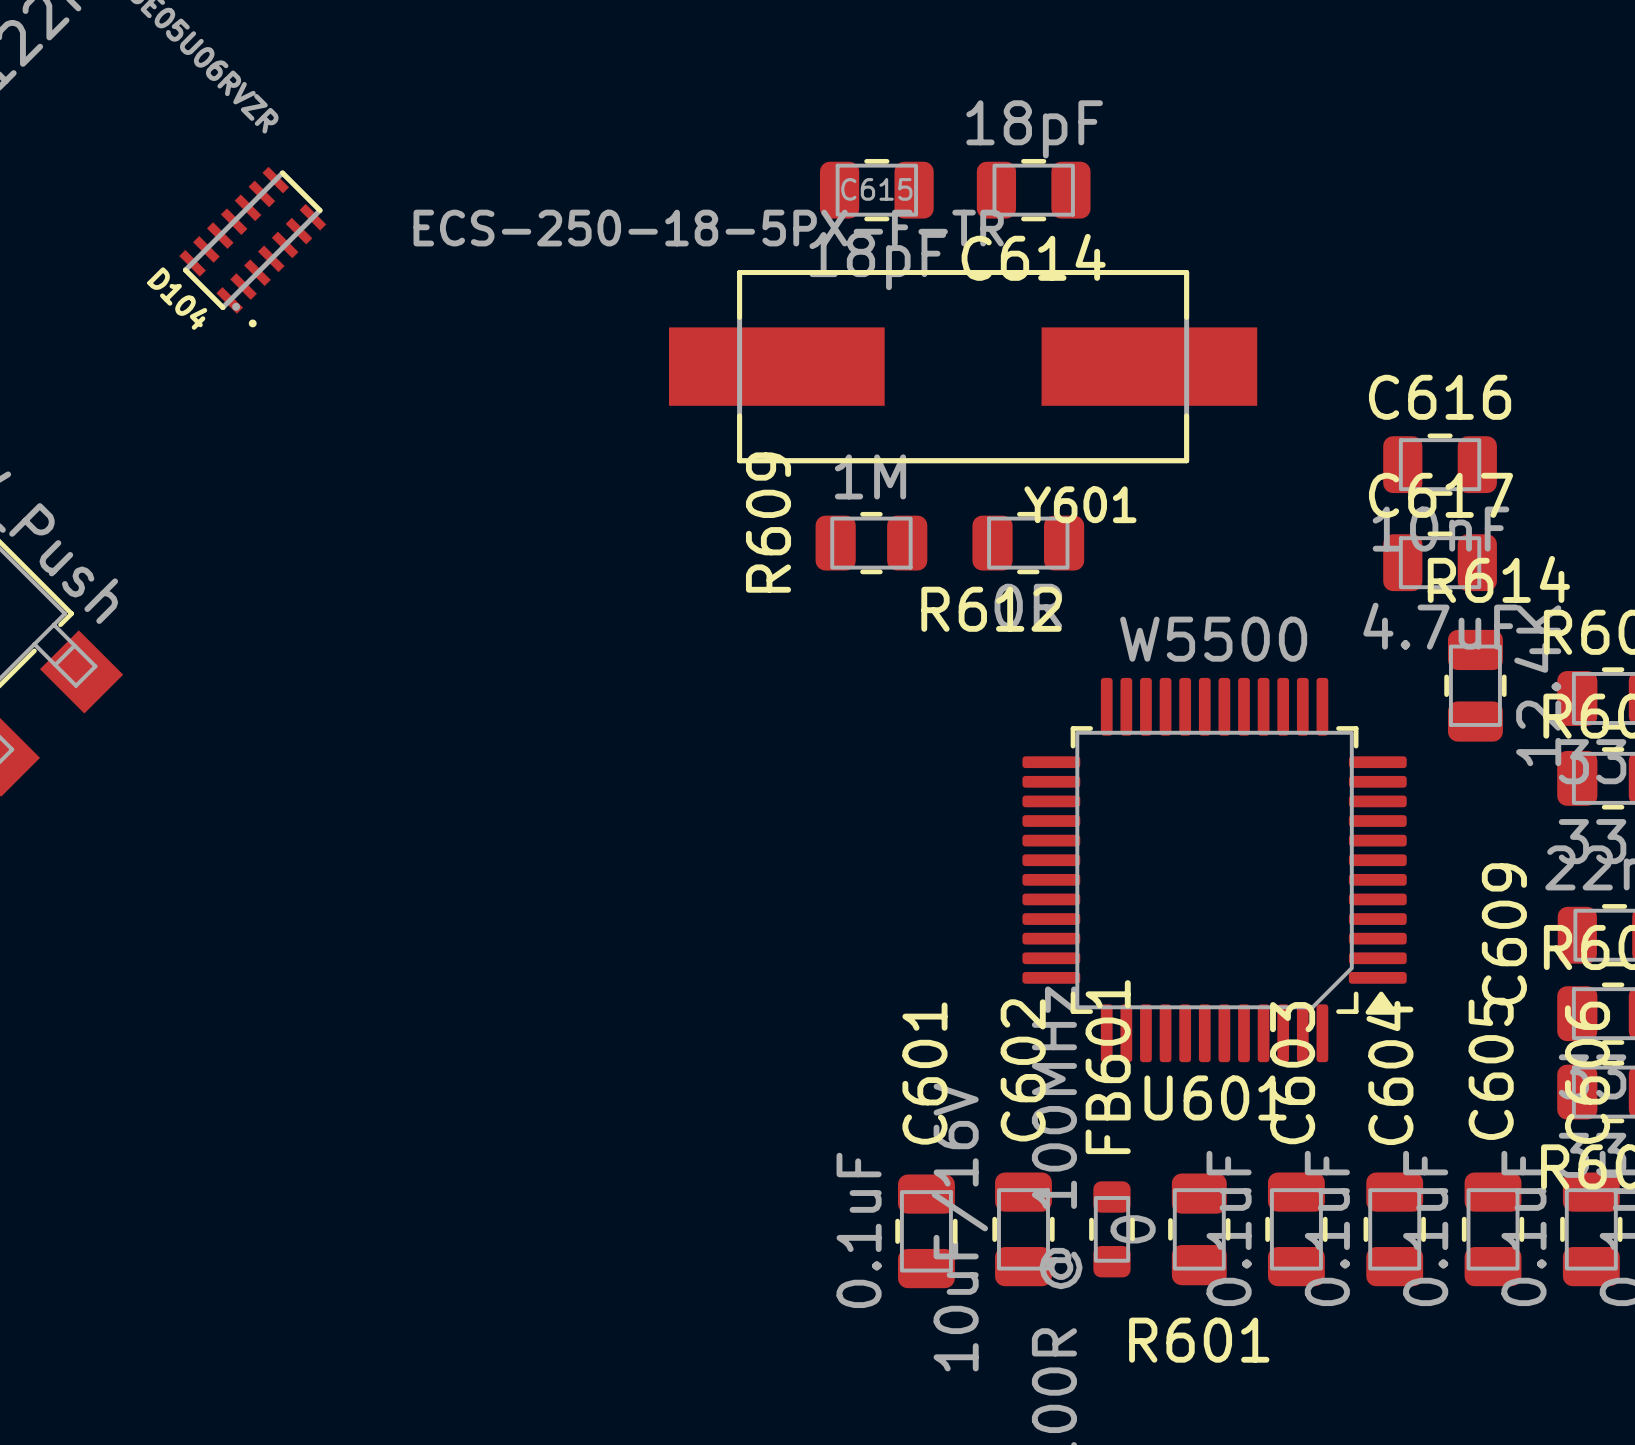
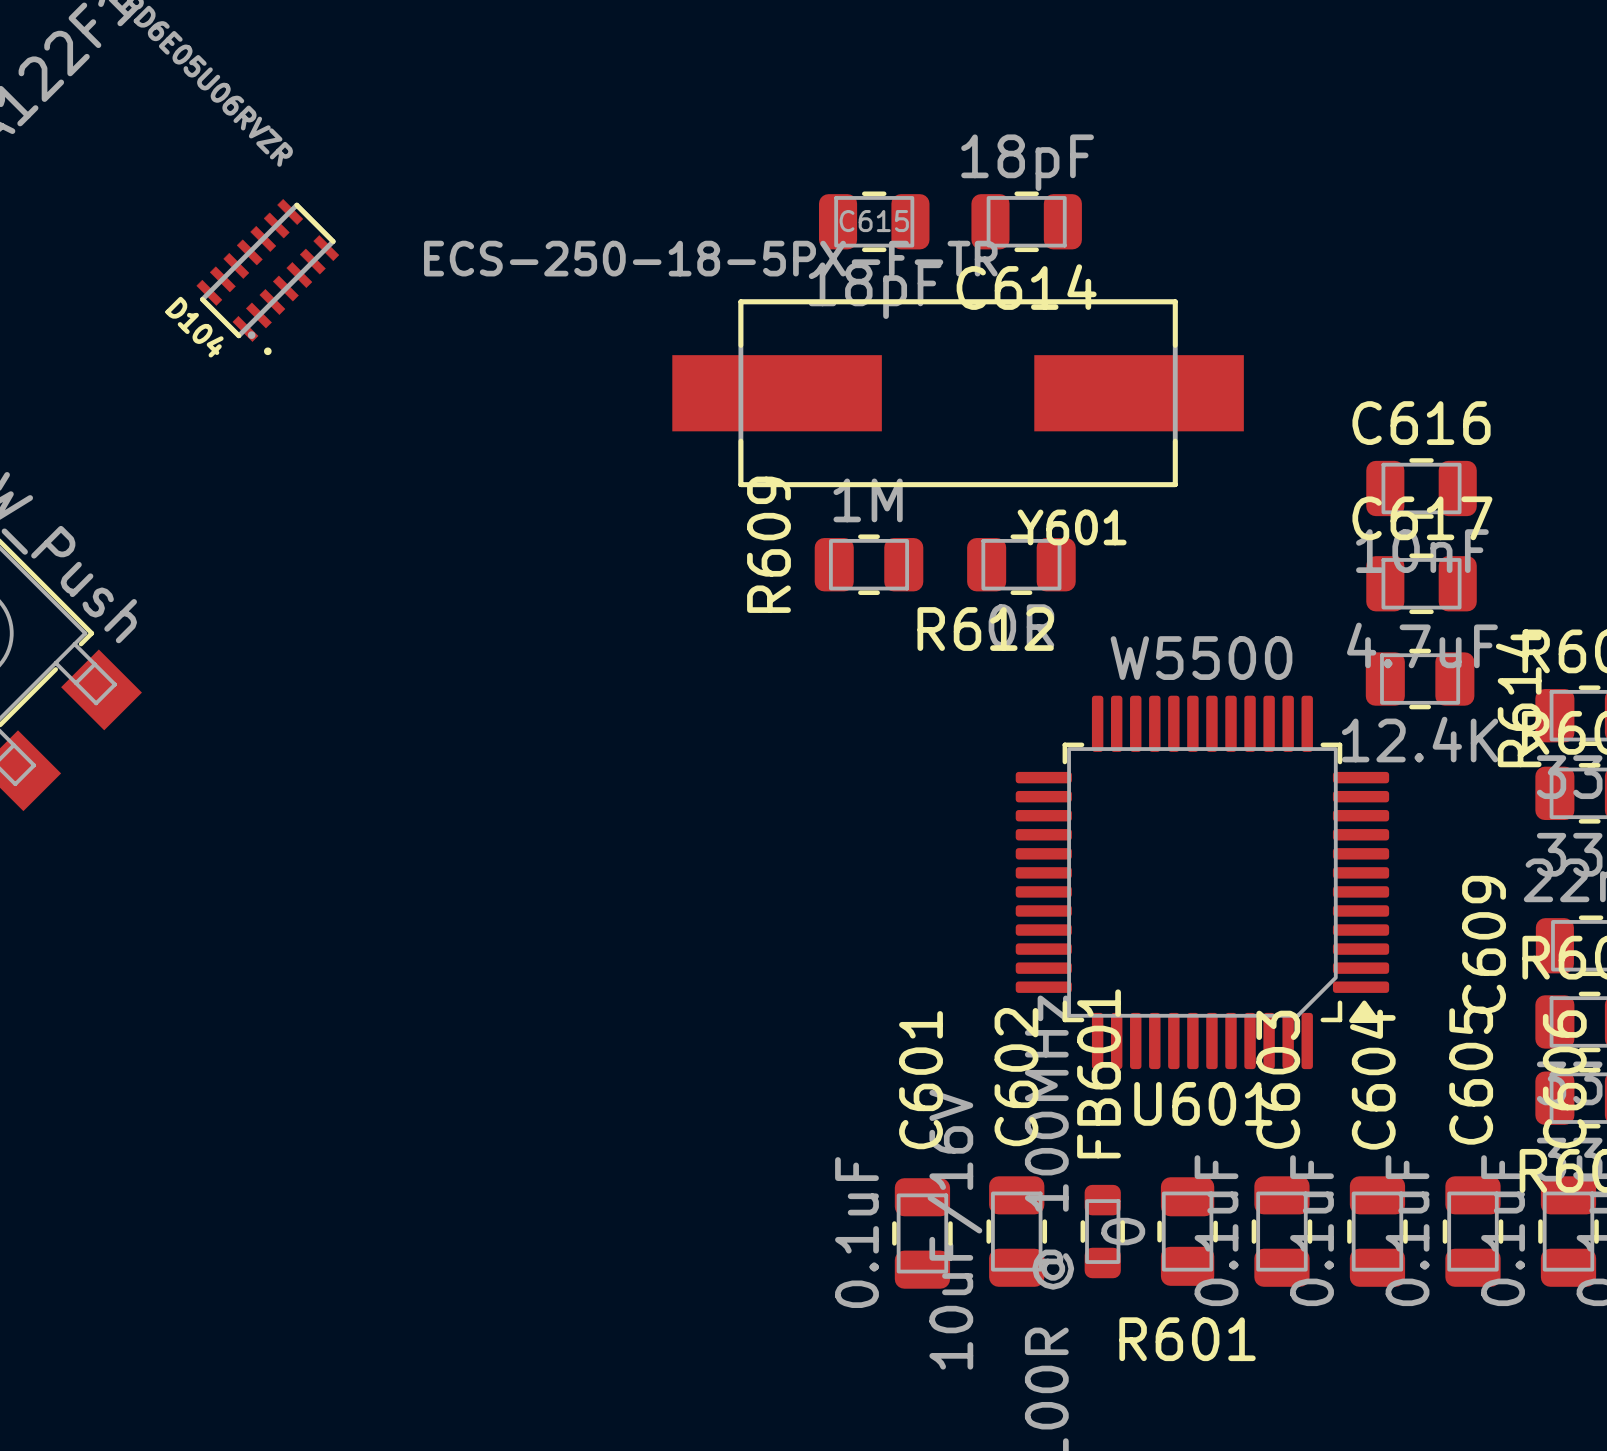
R614 rotation: 0° (1475, 685) -> 90° clockwise (1420, 679)

